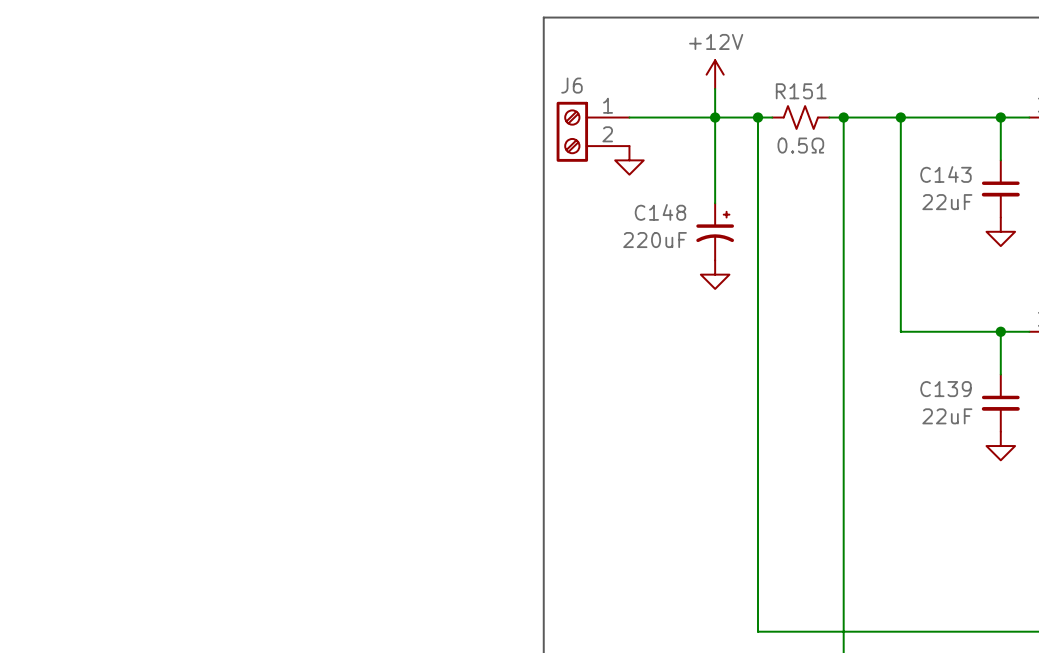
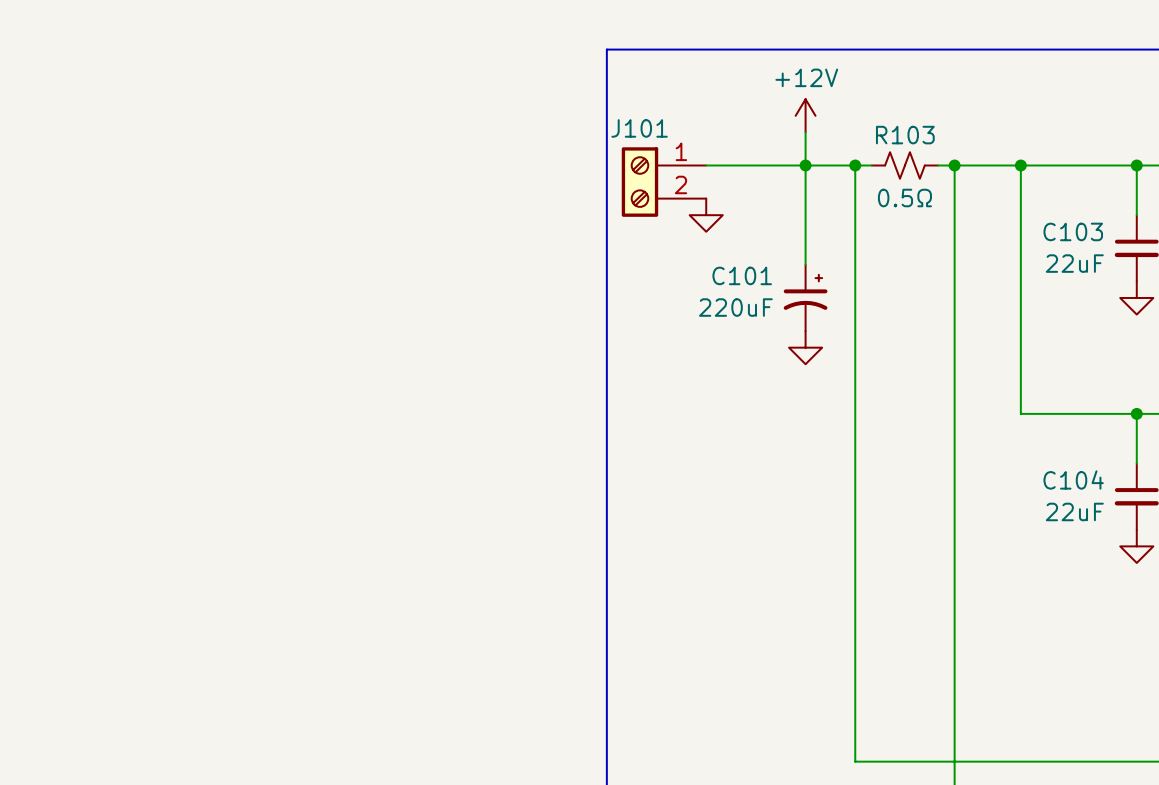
J6 name: J6 (571, 85) -> J101 (639, 128)
R151 name: R151 (801, 91) -> R103 (905, 135)
C143 name: C143 (945, 174) -> C103 (1073, 231)
C148 name: C148 (660, 212) -> C101 (742, 275)
C139 name: C139 (945, 389) -> C104 (1073, 479)

